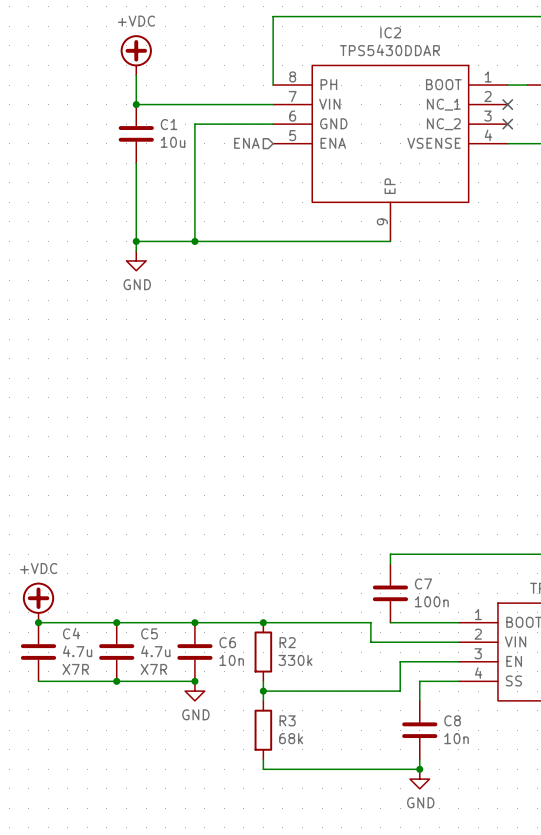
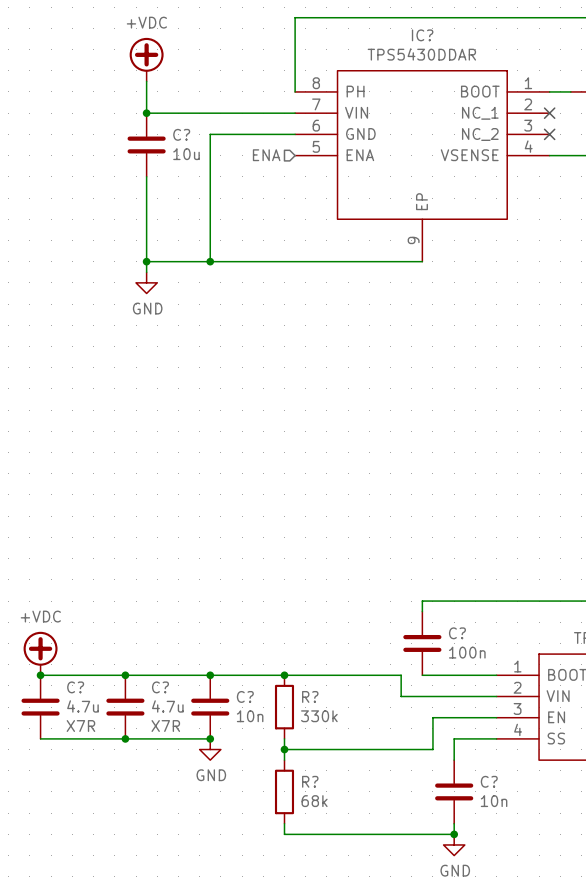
IC2 name: IC2 (390, 32) -> IC? (422, 35)
C1 name: C1 (169, 124) -> C? (181, 134)
C7 name: C7 (423, 584) -> C? (457, 633)
C4 name: C4 (71, 633) -> C? (75, 687)
C5 name: C5 (149, 633) -> C? (160, 687)
C6 name: C6 (227, 642) -> C? (245, 696)
R2 name: R2 (287, 642) -> R? (310, 696)
R3 name: R3 (287, 720) -> R? (310, 781)
C8 name: C8 (452, 720) -> C? (489, 781)

